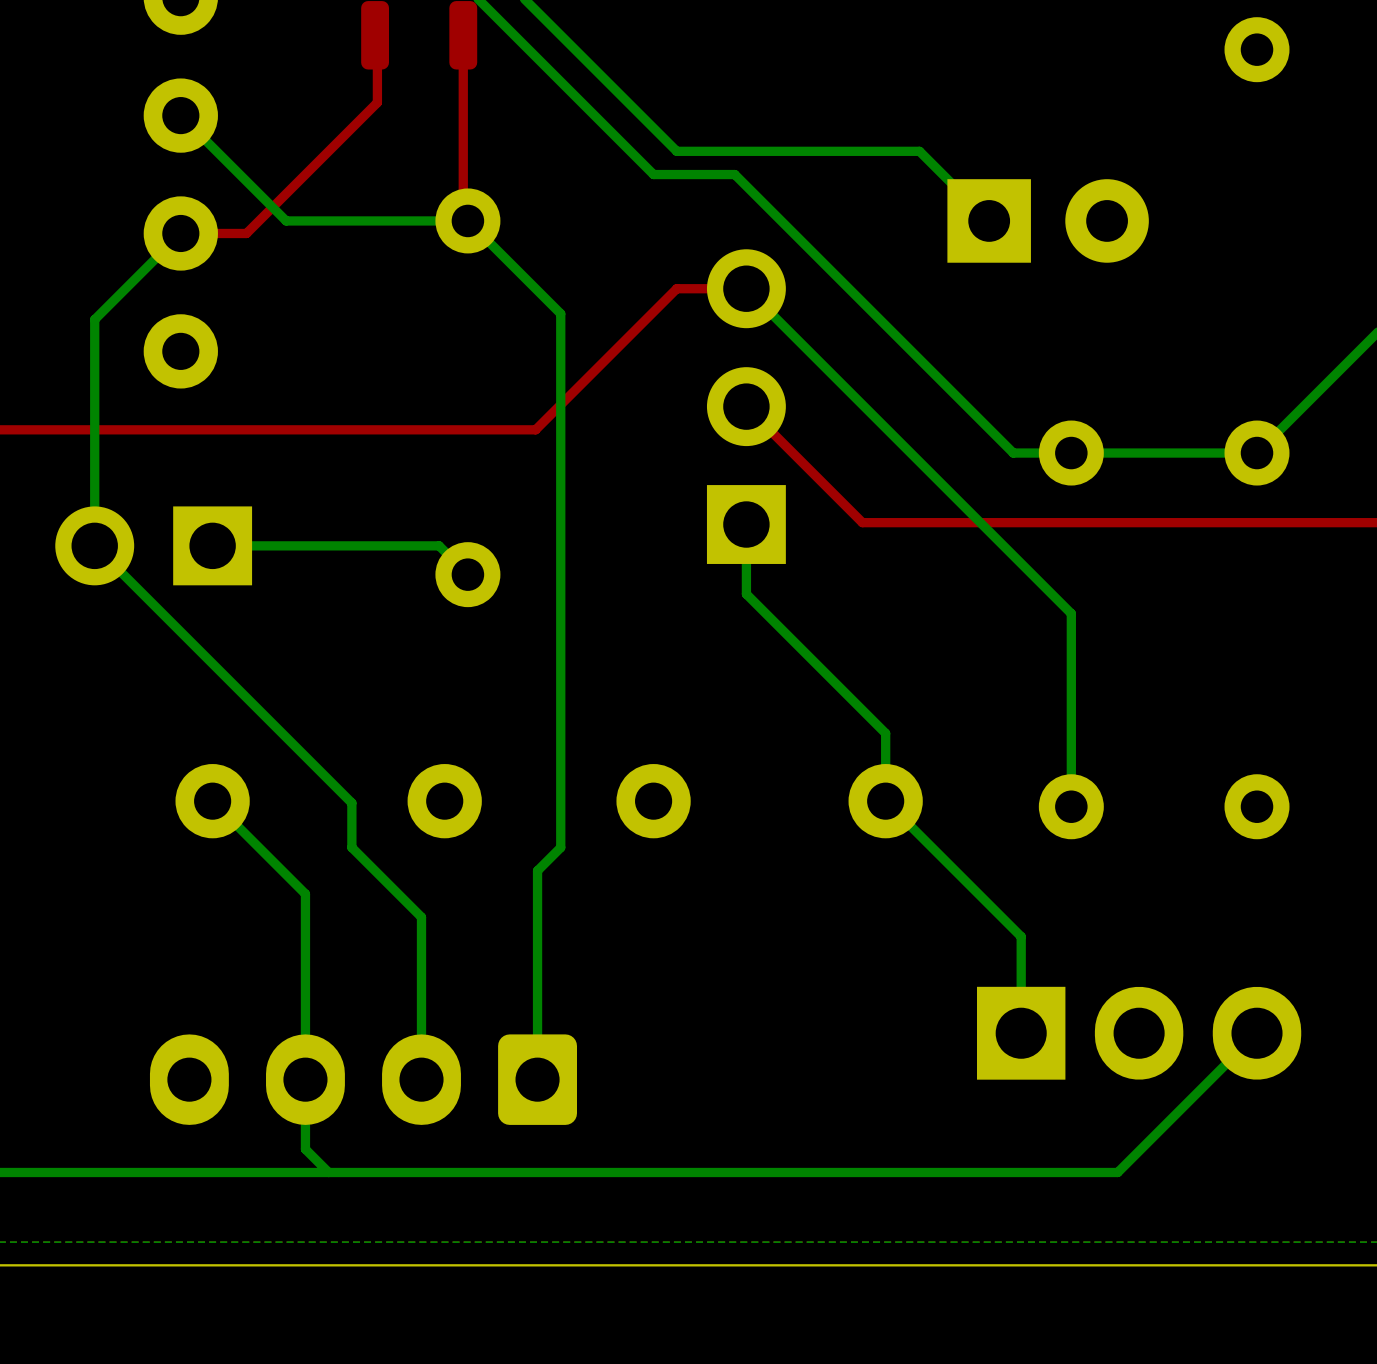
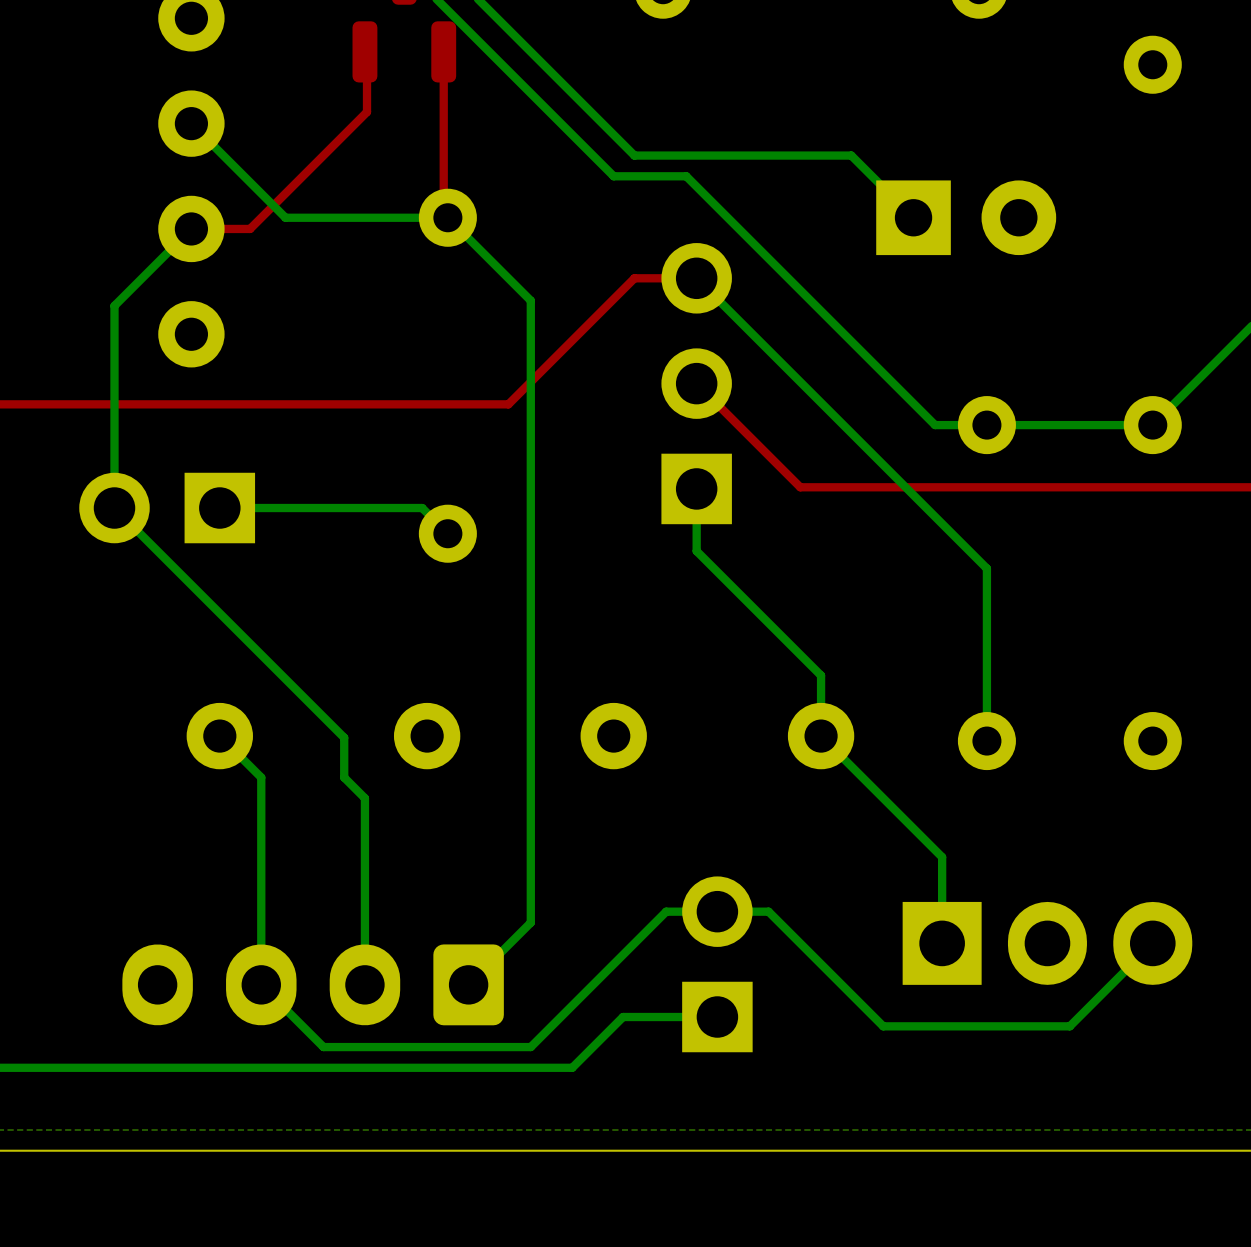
bottom track: (259, 847) (305, 893) (305, 1149) (328, 1172) -> (261, 777) (261, 984) (323, 1047) (530, 1047) (666, 911) (768, 911) (883, 1026) (1069, 1026)
bottom track: (560, 847) (537, 870) (537, 1079) -> (530, 777) (530, 922) (468, 984)
bottom track: (375, 870) (421, 917) (421, 1079) -> (364, 798) (364, 984)
part: none -> (717, 964)
part position: (363, 1079) -> (313, 984)
bottom track: (1164, 1126) (1117, 1172) (607, 1172) -> (717, 1017) (623, 1017) (572, 1067)

